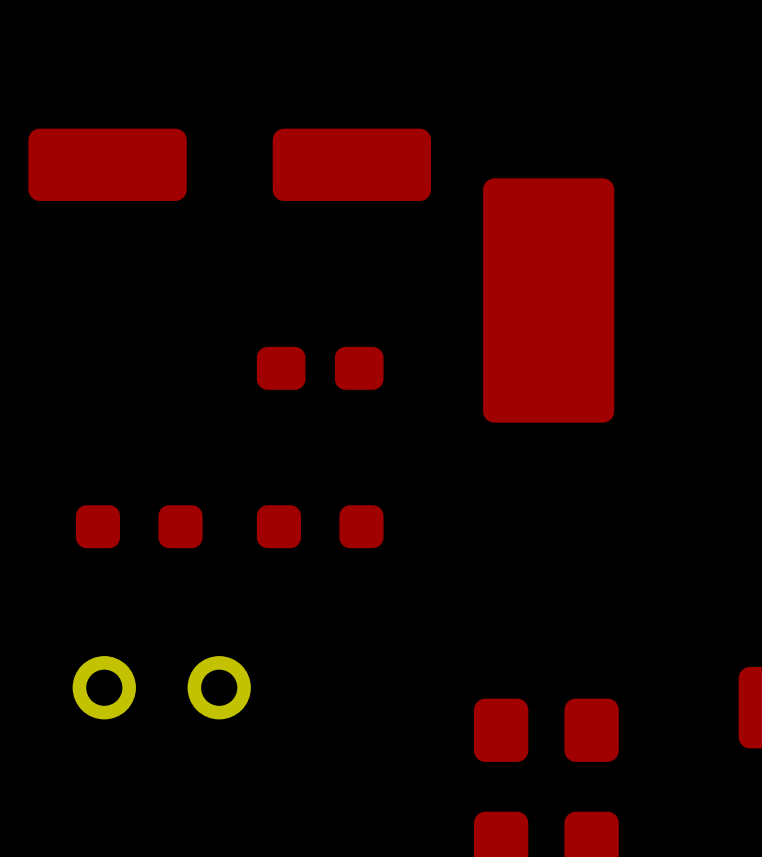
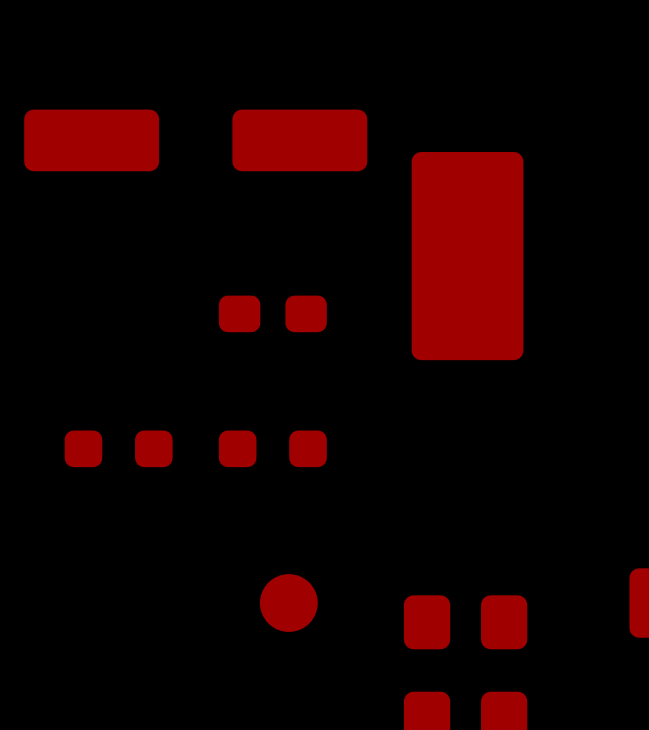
part: (161, 687) -> none
part: none -> (288, 603)

